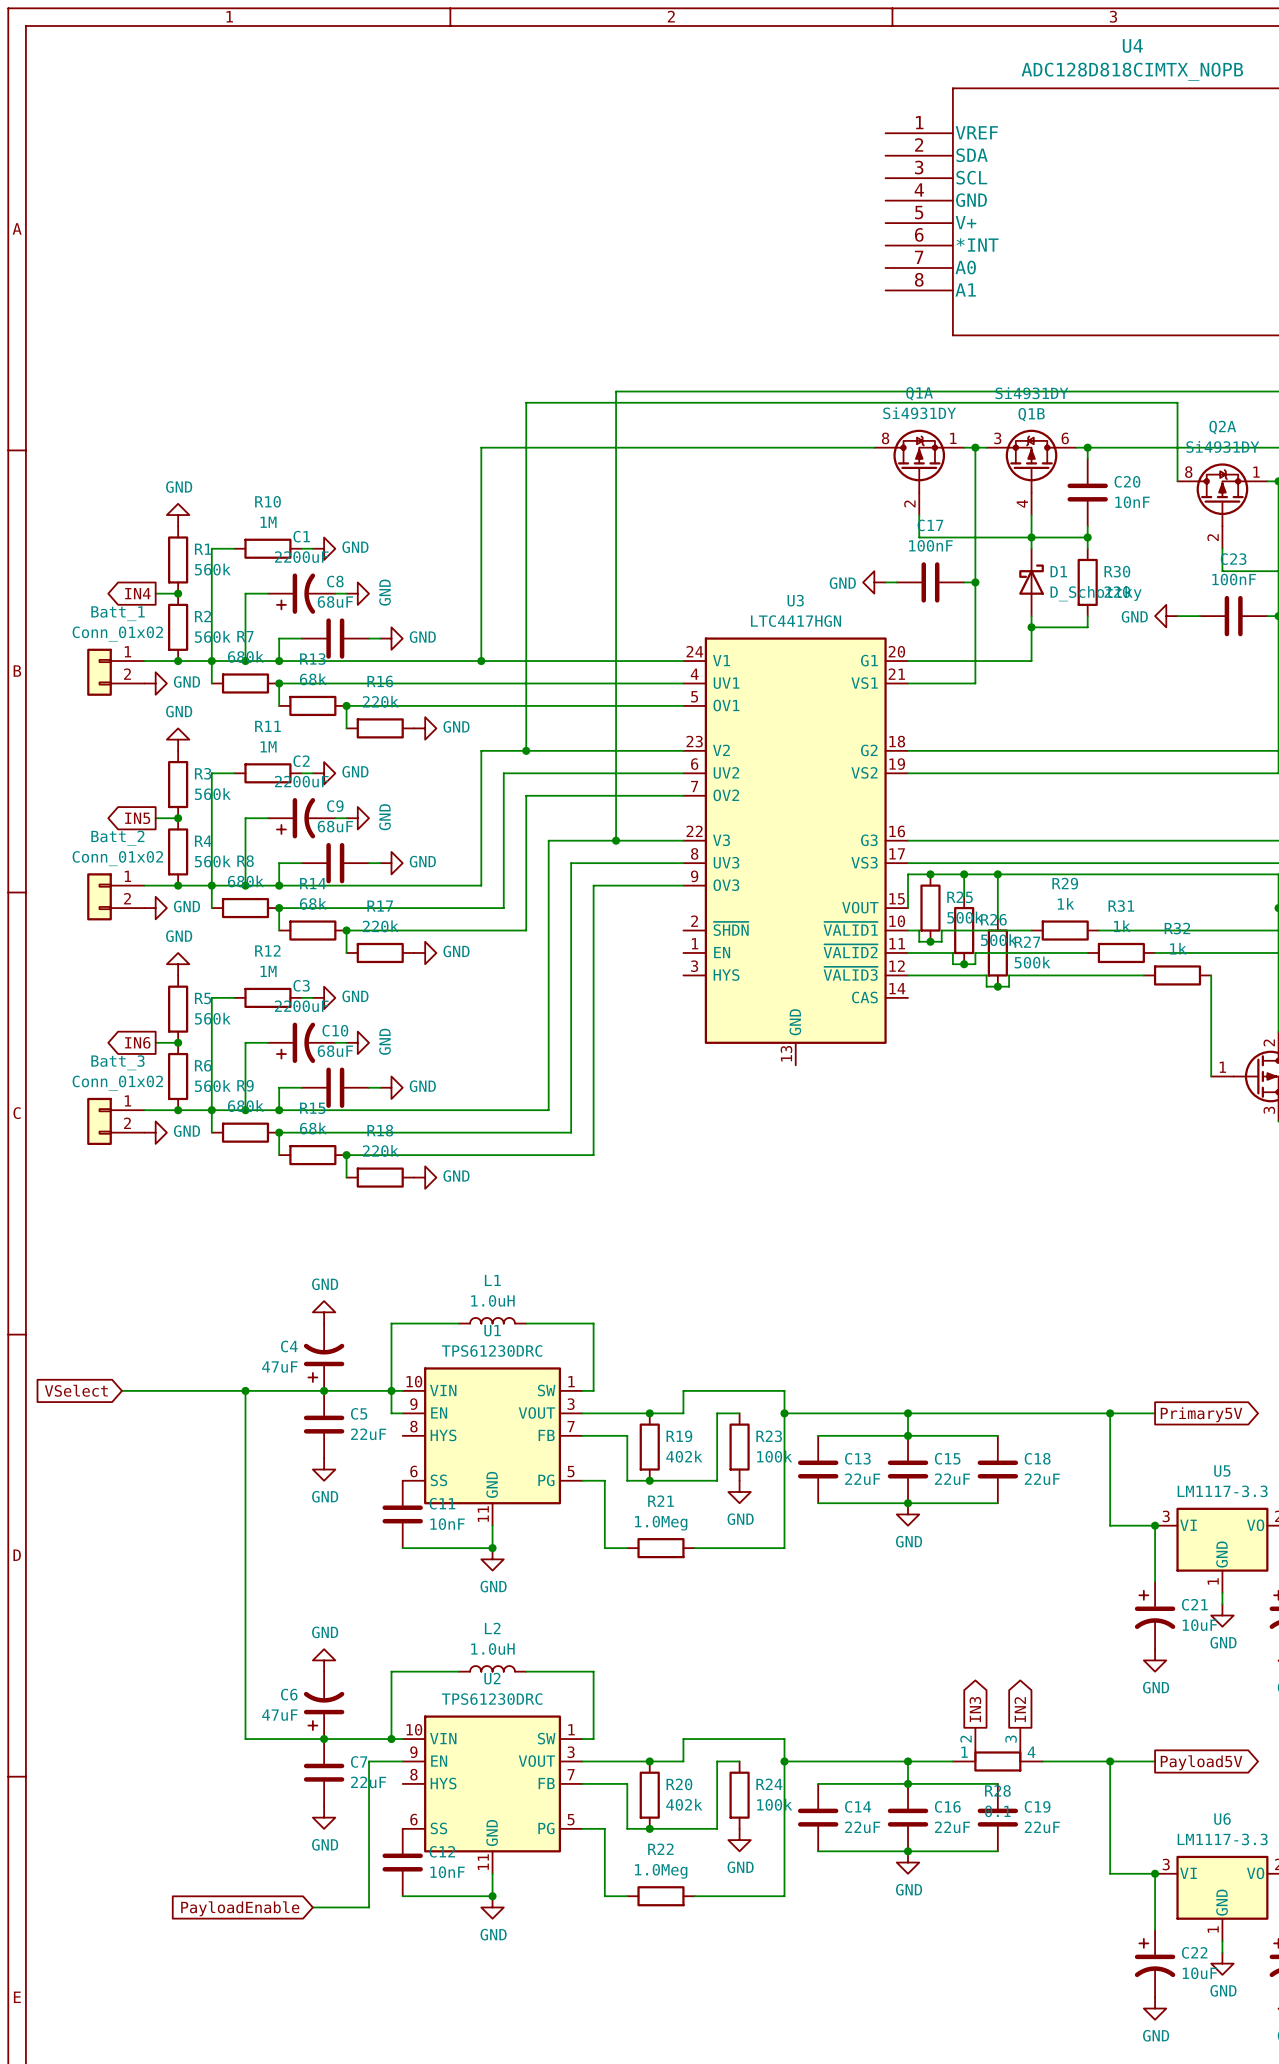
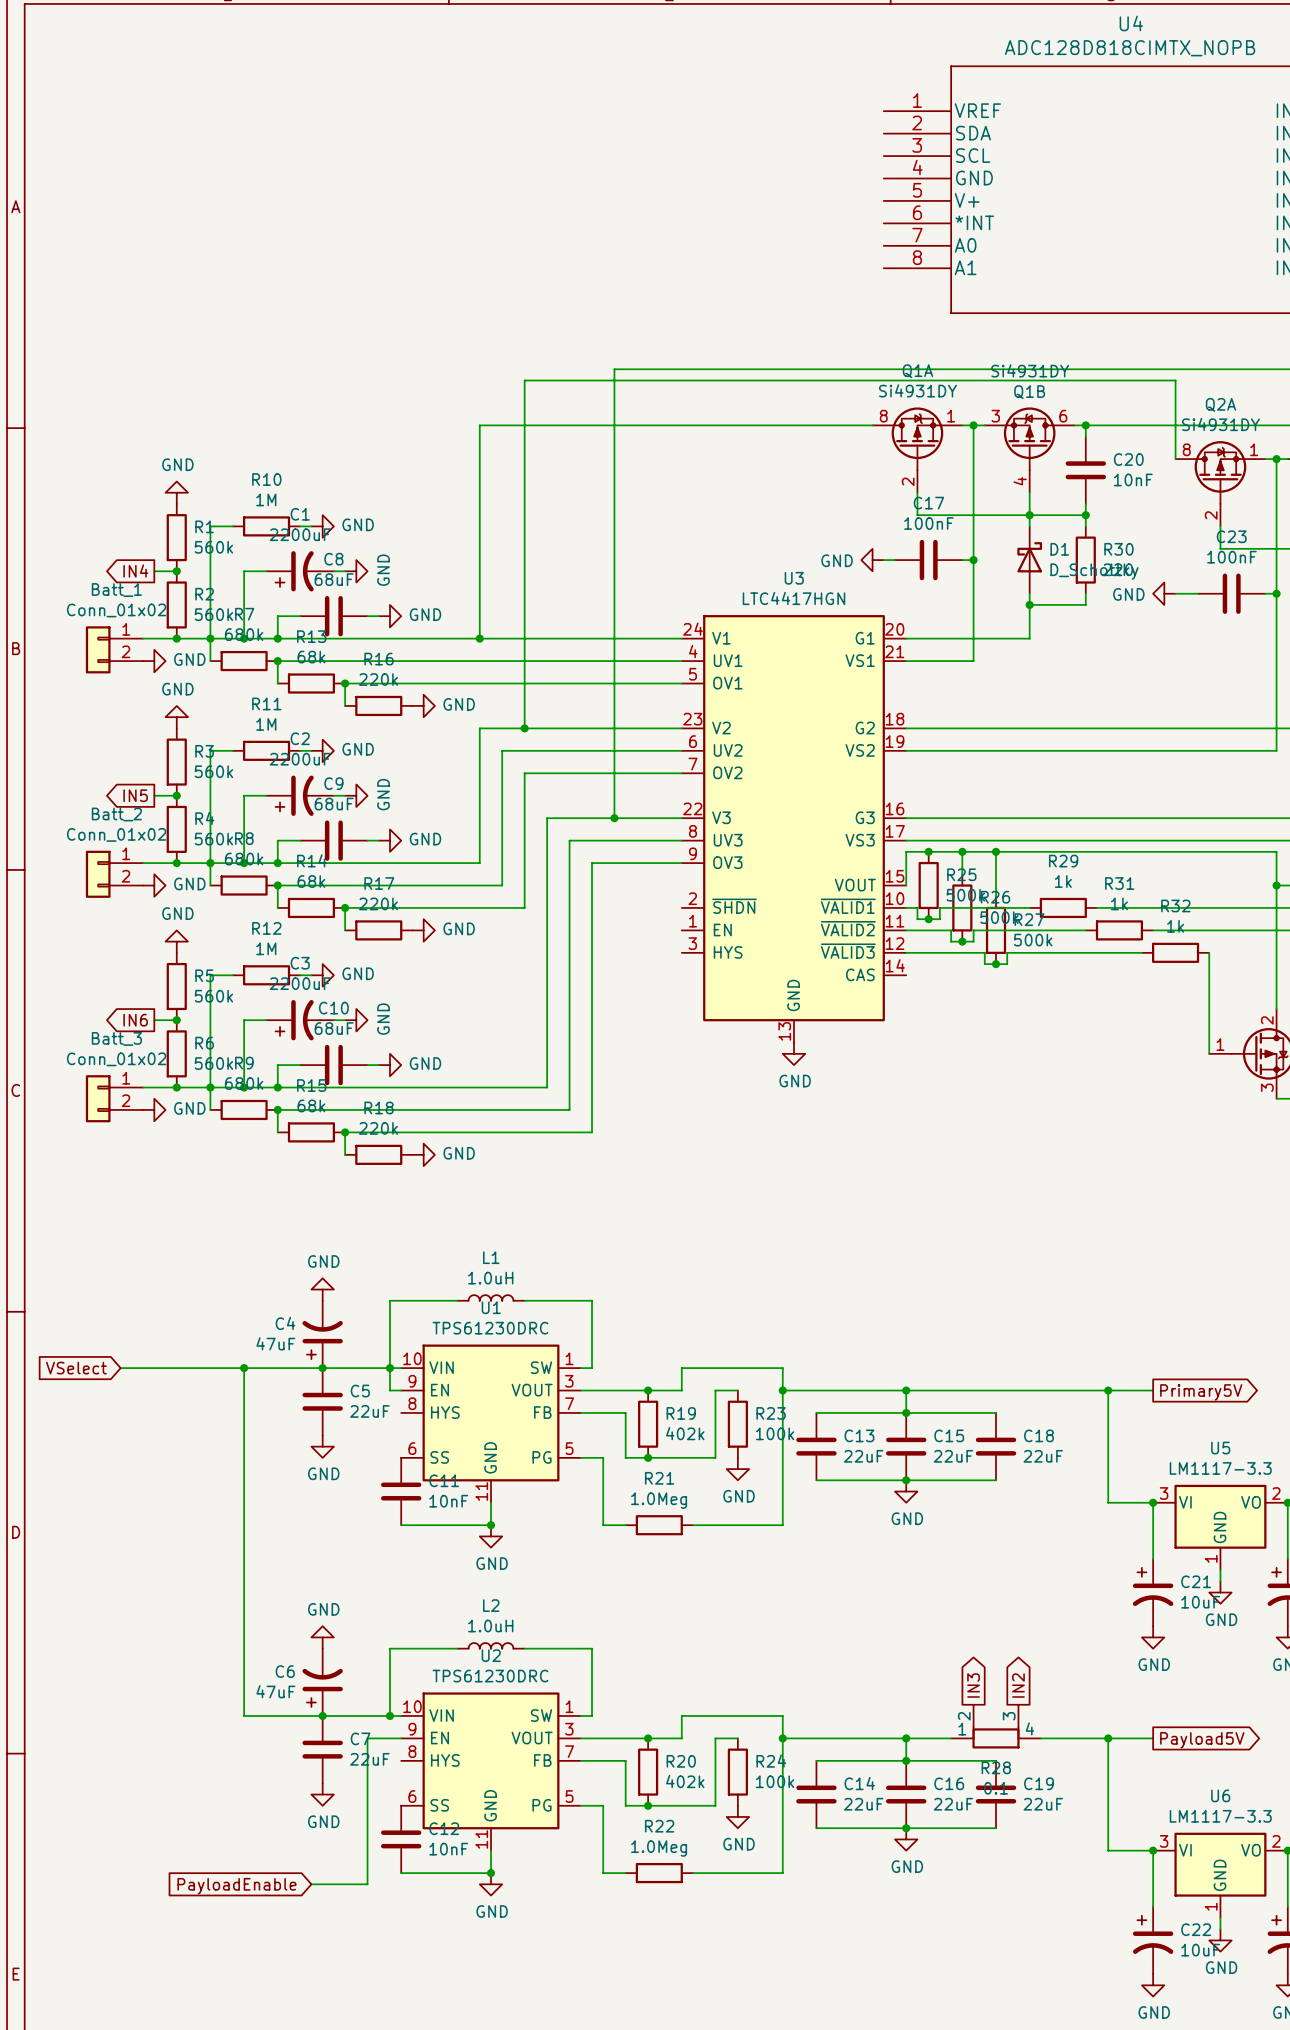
power symbol: none -> GND (794, 1053)

